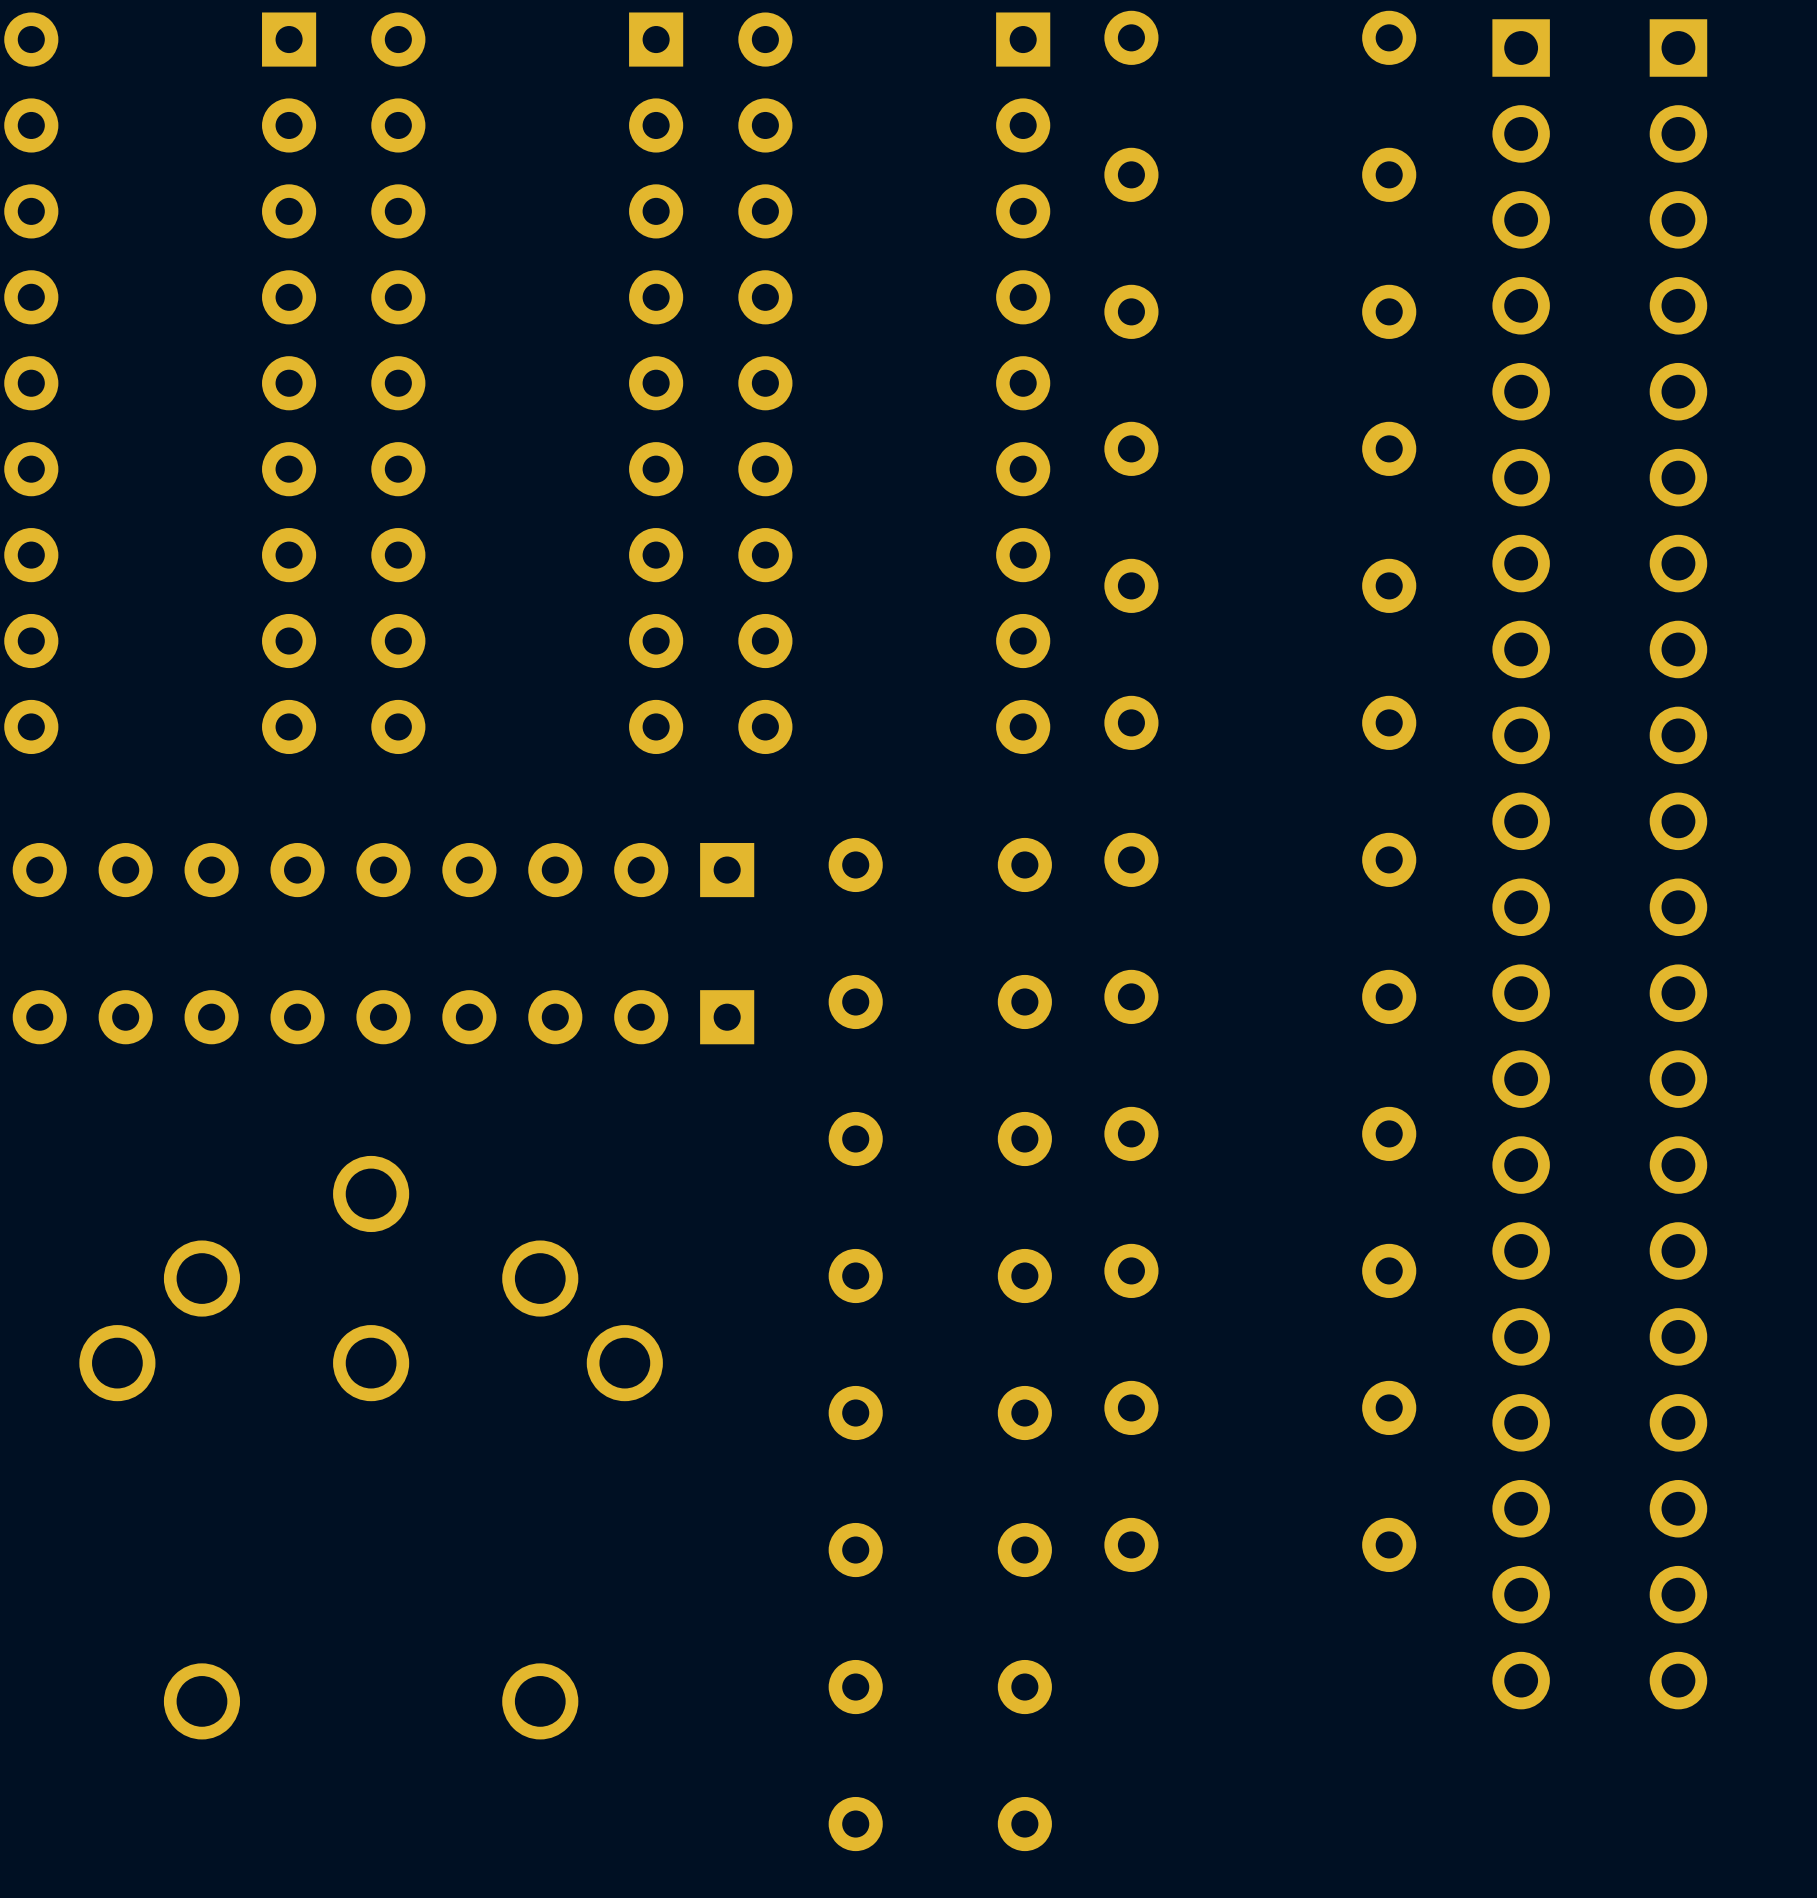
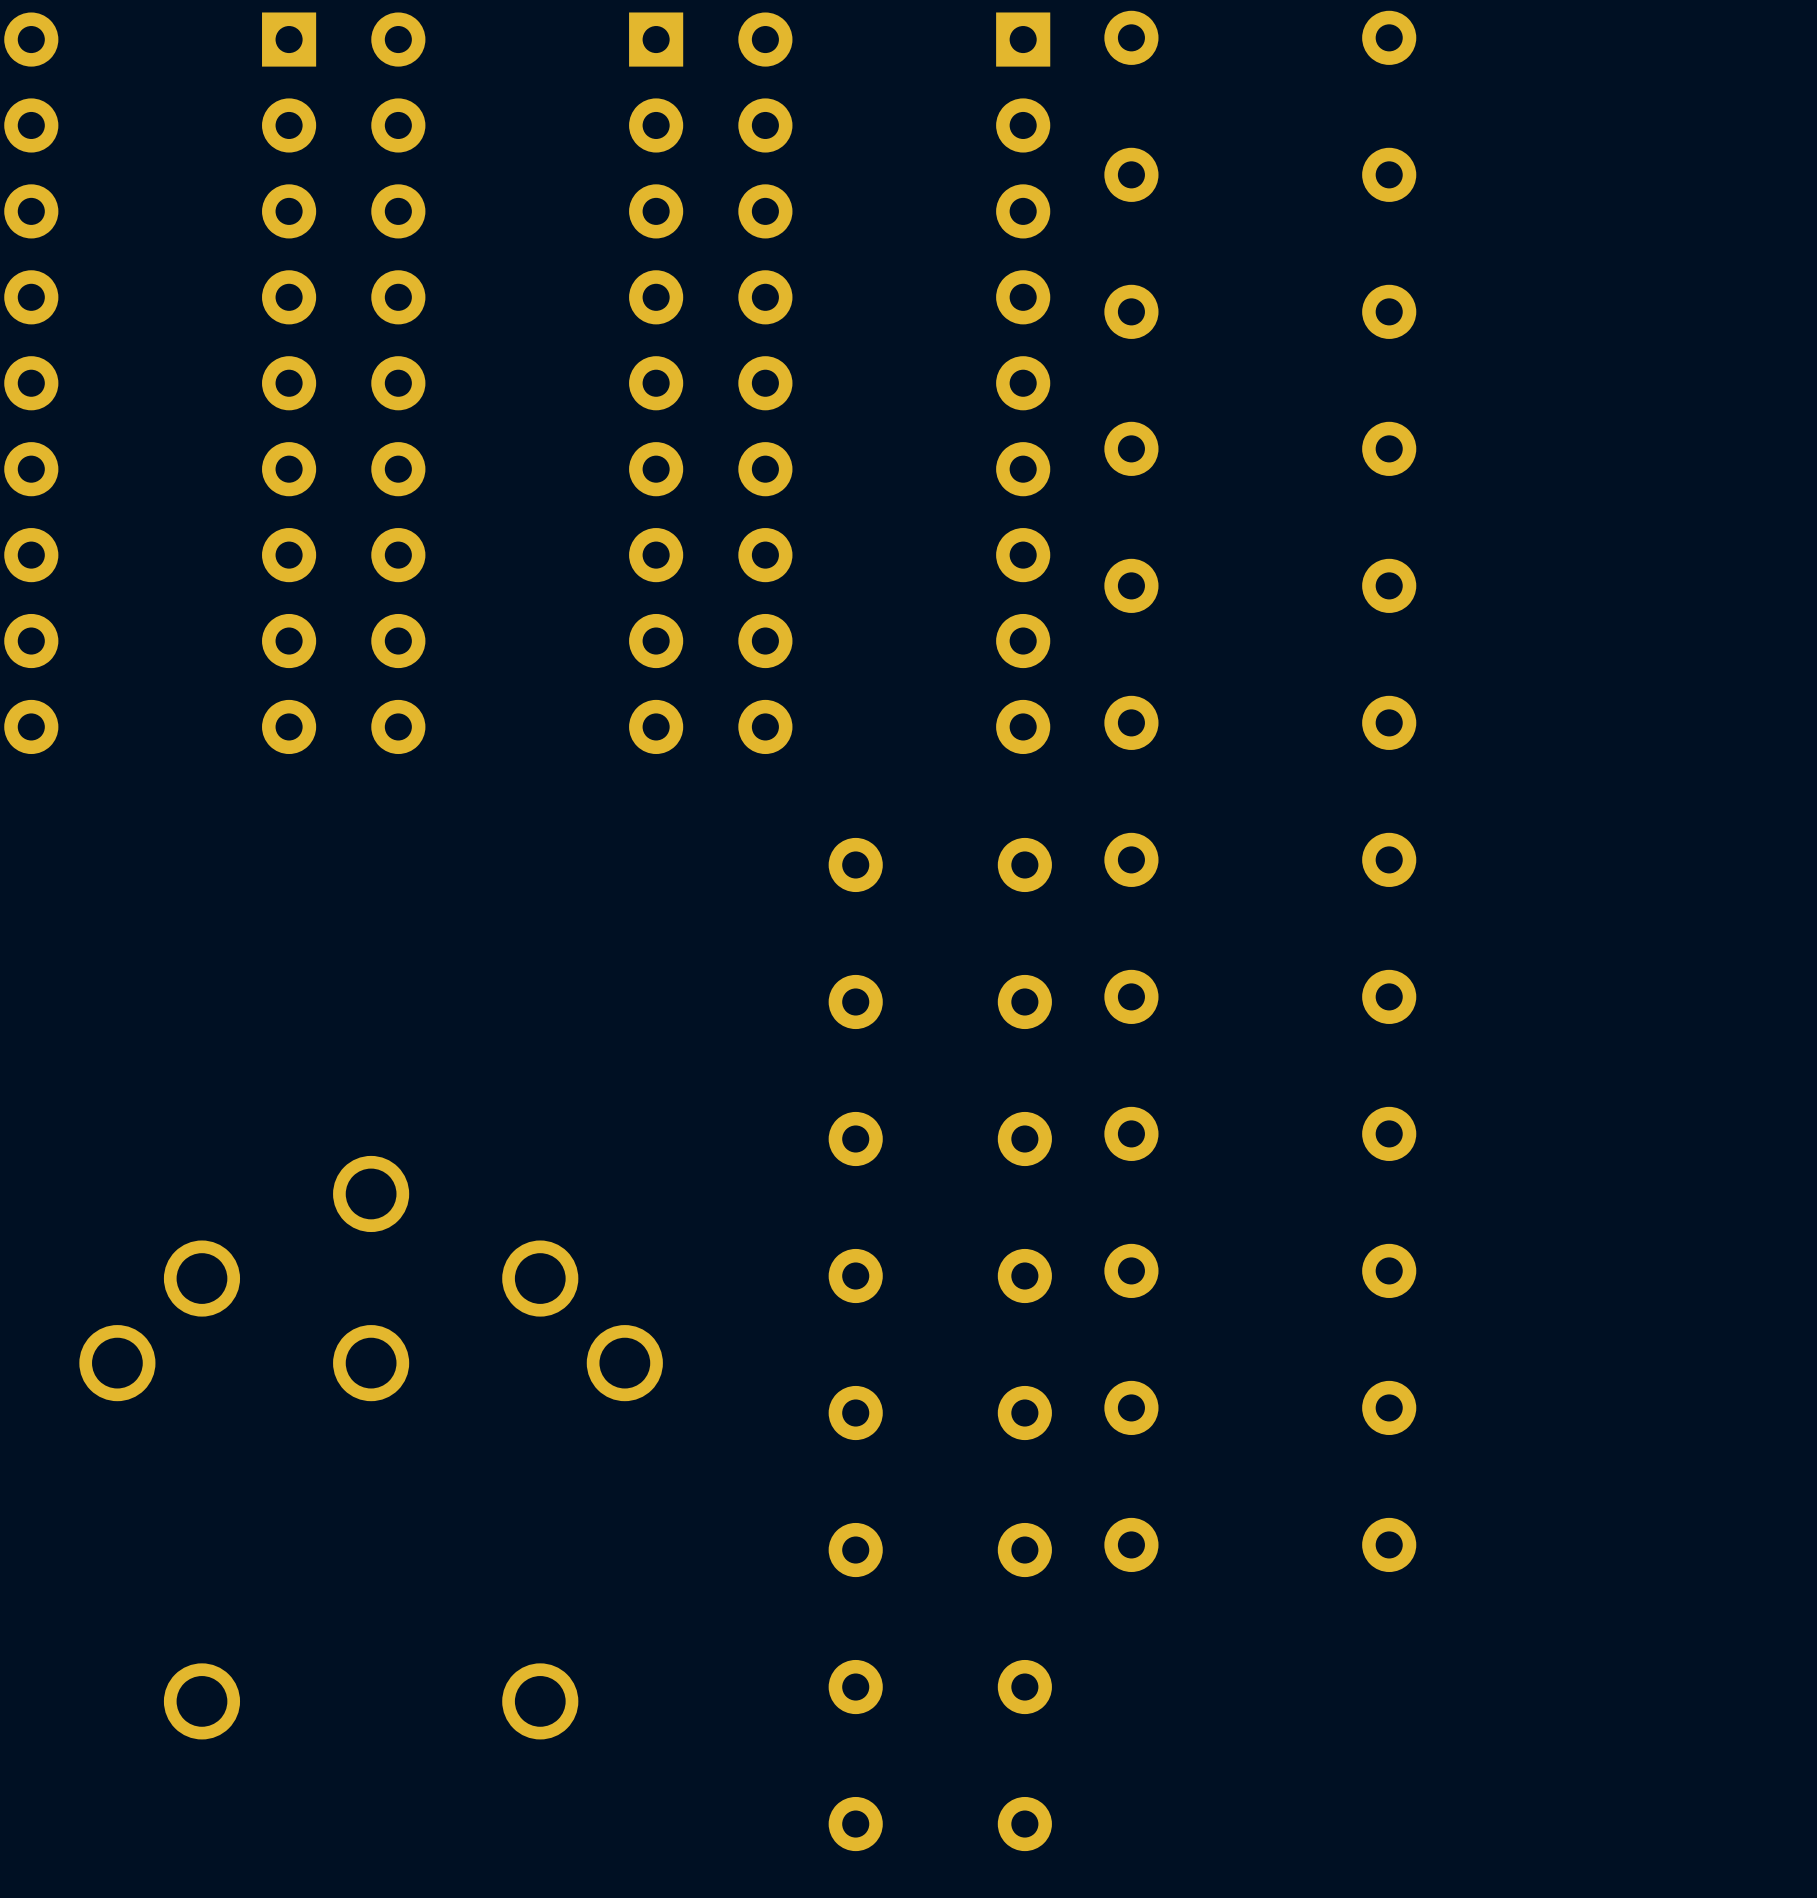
part: (1521, 864) -> none
part: (1678, 864) -> none
part: (383, 870) -> none
part: (383, 1017) -> none

